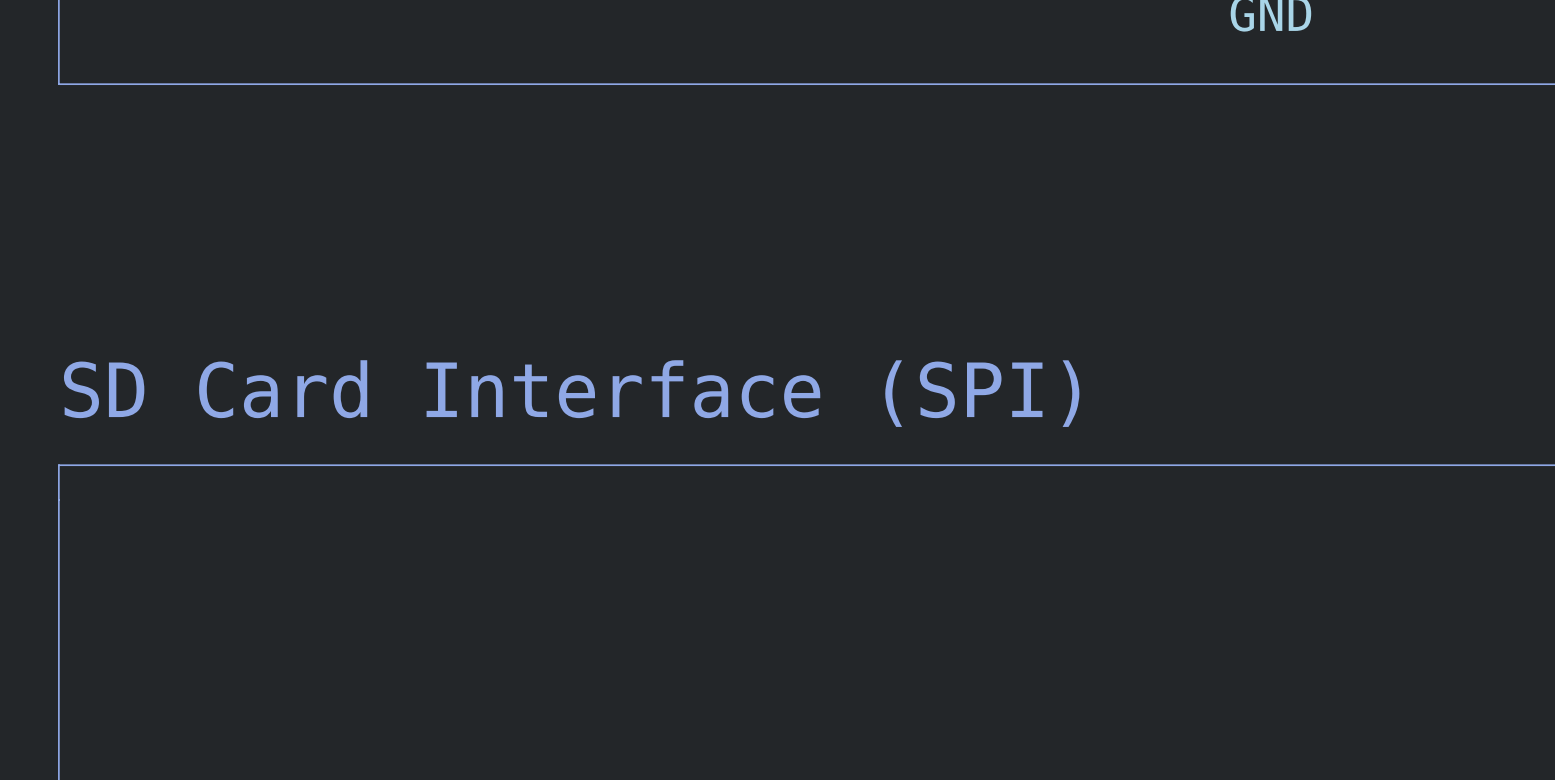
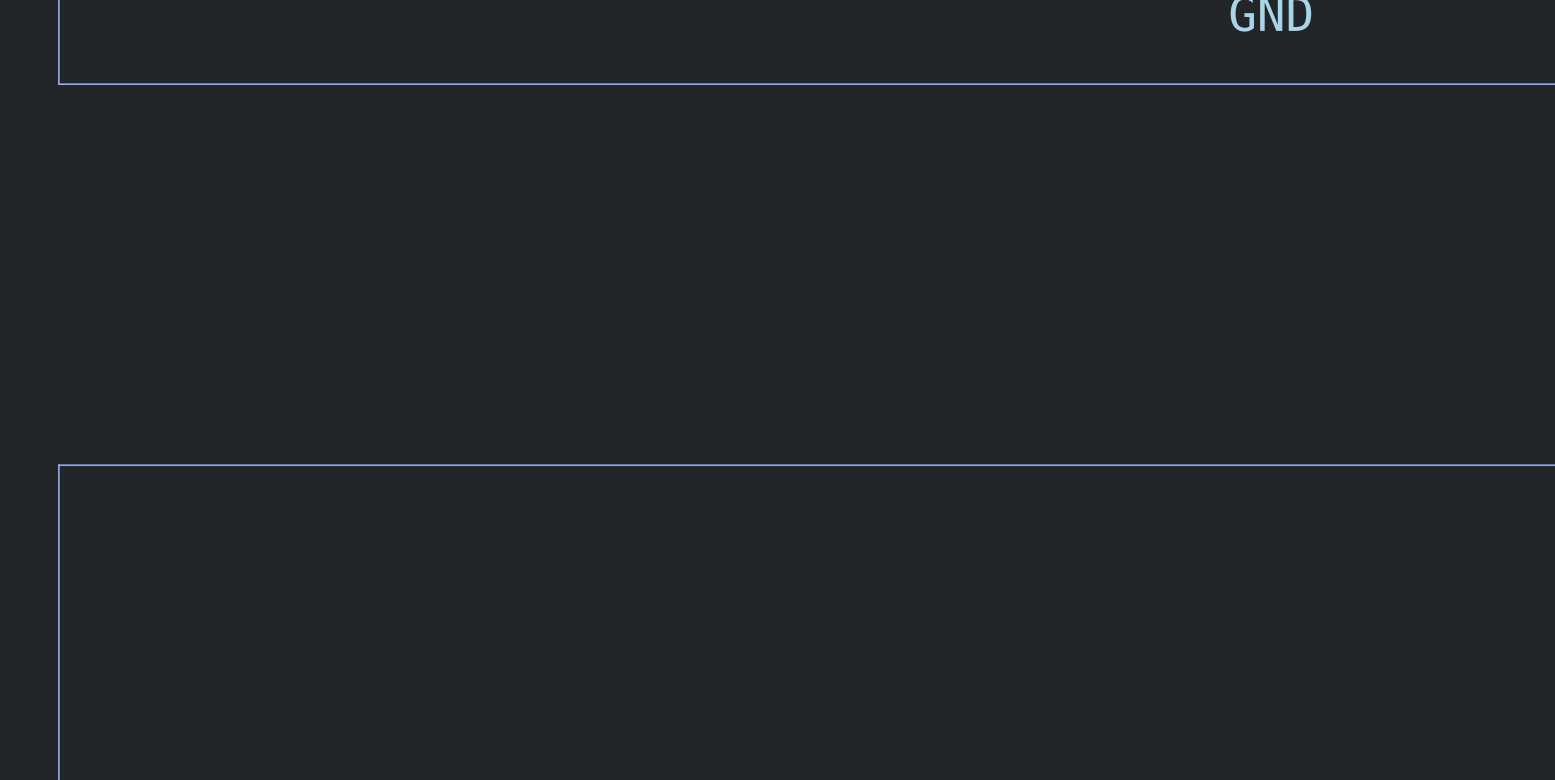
text: SD Card Interface (SPI) (571, 393) -> none

